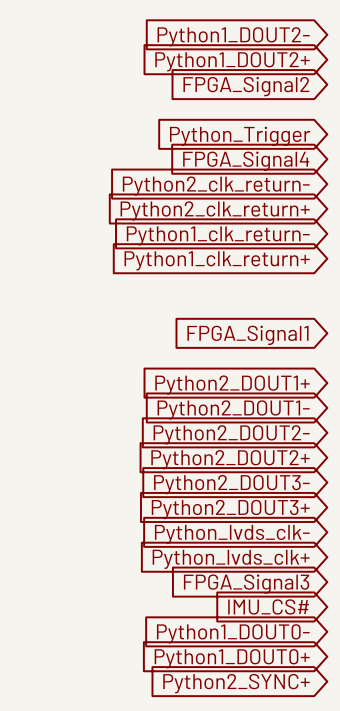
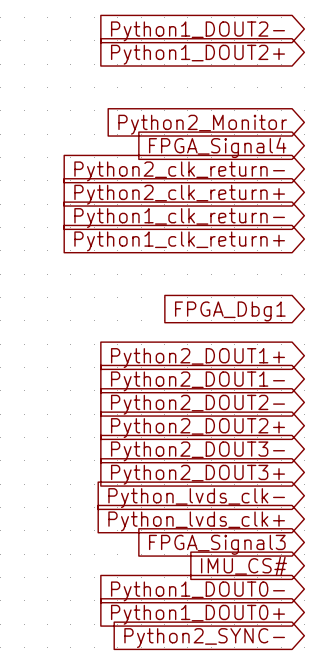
global label: FPGA_Signal2 (246, 86) -> none
global label: Python_Trigger (240, 136) -> Python2_Monitor (202, 124)
global label: FPGA_Signal1 (247, 335) -> FPGA_Dbg1 (230, 311)
global label: Python2_SYNC+ (236, 683) -> Python2_SYNC- (204, 638)

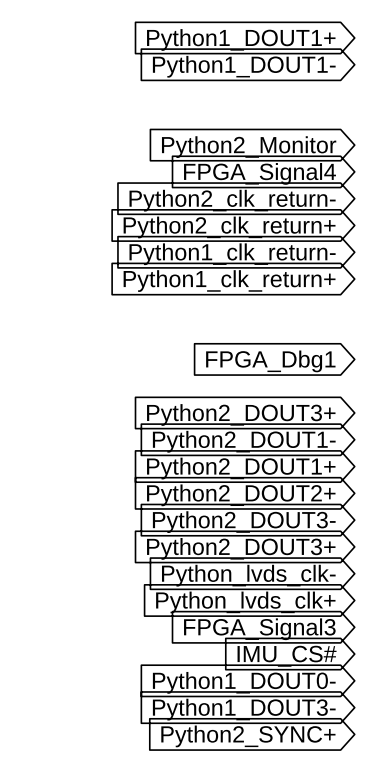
global label: Python1_DOUT2- (198, 31) -> Python1_DOUT1+ (241, 39)
global label: Python1_DOUT2+ (198, 54) -> Python1_DOUT1- (244, 66)
global label: Python2_DOUT1+ (198, 358) -> Python2_DOUT3+ (241, 414)
global label: Python2_DOUT2- (198, 404) -> Python2_DOUT1+ (241, 468)
global label: Python1_DOUT0+ (198, 614) -> Python1_DOUT3- (244, 709)
global label: Python2_SYNC- (204, 638) -> Python2_SYNC+ (248, 736)

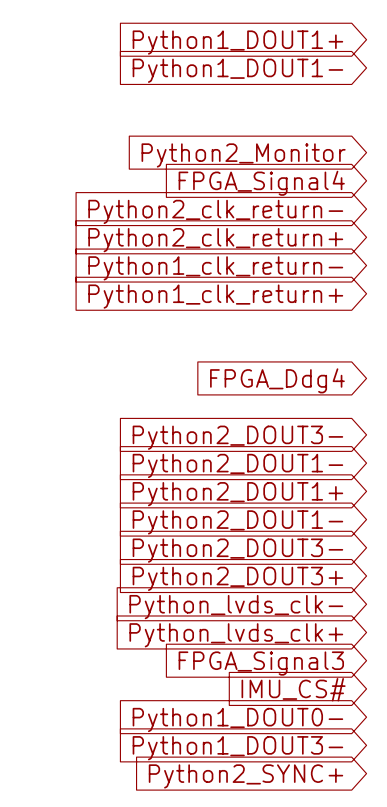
global label: FPGA_Dbg1 (270, 361) -> FPGA_Ddg4 (277, 380)
global label: Python2_DOUT3+ (241, 414) -> Python2_DOUT3- (237, 437)
global label: Python2_DOUT2+ (241, 495) -> Python2_DOUT1- (237, 522)

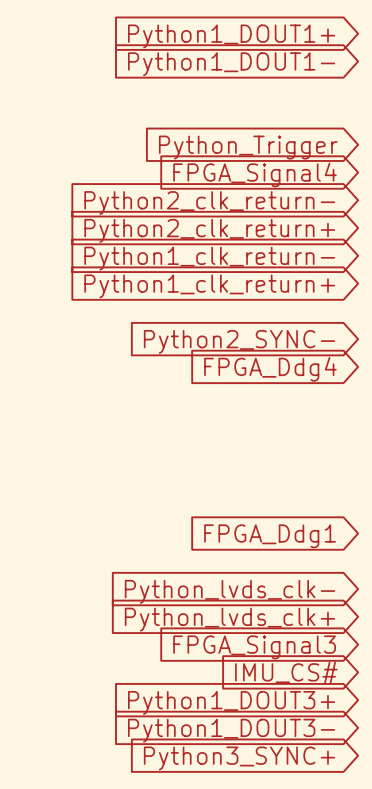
global label: Python2_Monitor (243, 155) -> Python_Trigger (248, 147)
global label: none -> Python2_SYNC- (239, 341)
global label: Python2_DOUT3- (237, 437) -> none
global label: Python2_DOUT1- (237, 465) -> none
global label: Python2_DOUT1+ (237, 494) -> none
global label: Python2_DOUT1- (237, 522) -> none
global label: Python2_DOUT3- (237, 550) -> FPGA_Ddg1 (270, 536)
global label: Python2_DOUT3+ (237, 578) -> none
global label: Python1_DOUT0- (237, 719) -> Python1_DOUT3+ (231, 702)
global label: Python2_SYNC+ (245, 776) -> Python3_SYNC+ (239, 758)

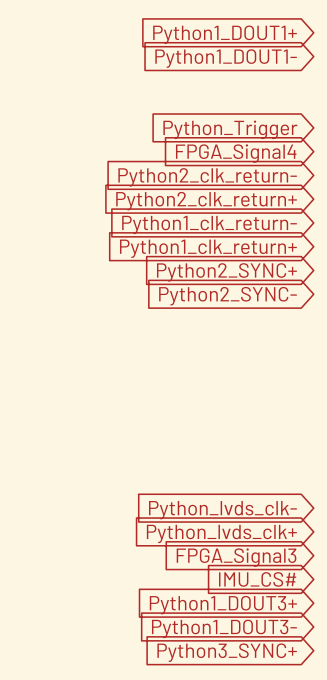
global label: none -> Python2_SYNC+ (226, 272)
global label: FPGA_Ddg4 (270, 369) -> none
global label: FPGA_Ddg1 (270, 536) -> none

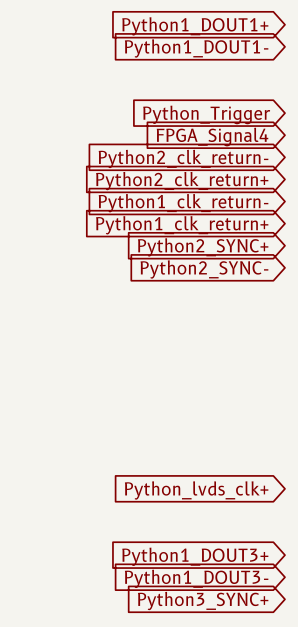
global label: Python_lvds_clk- (222, 510) -> none
global label: FPGA_Signal3 (236, 557) -> none
global label: IMU_CS# (257, 579) -> none

